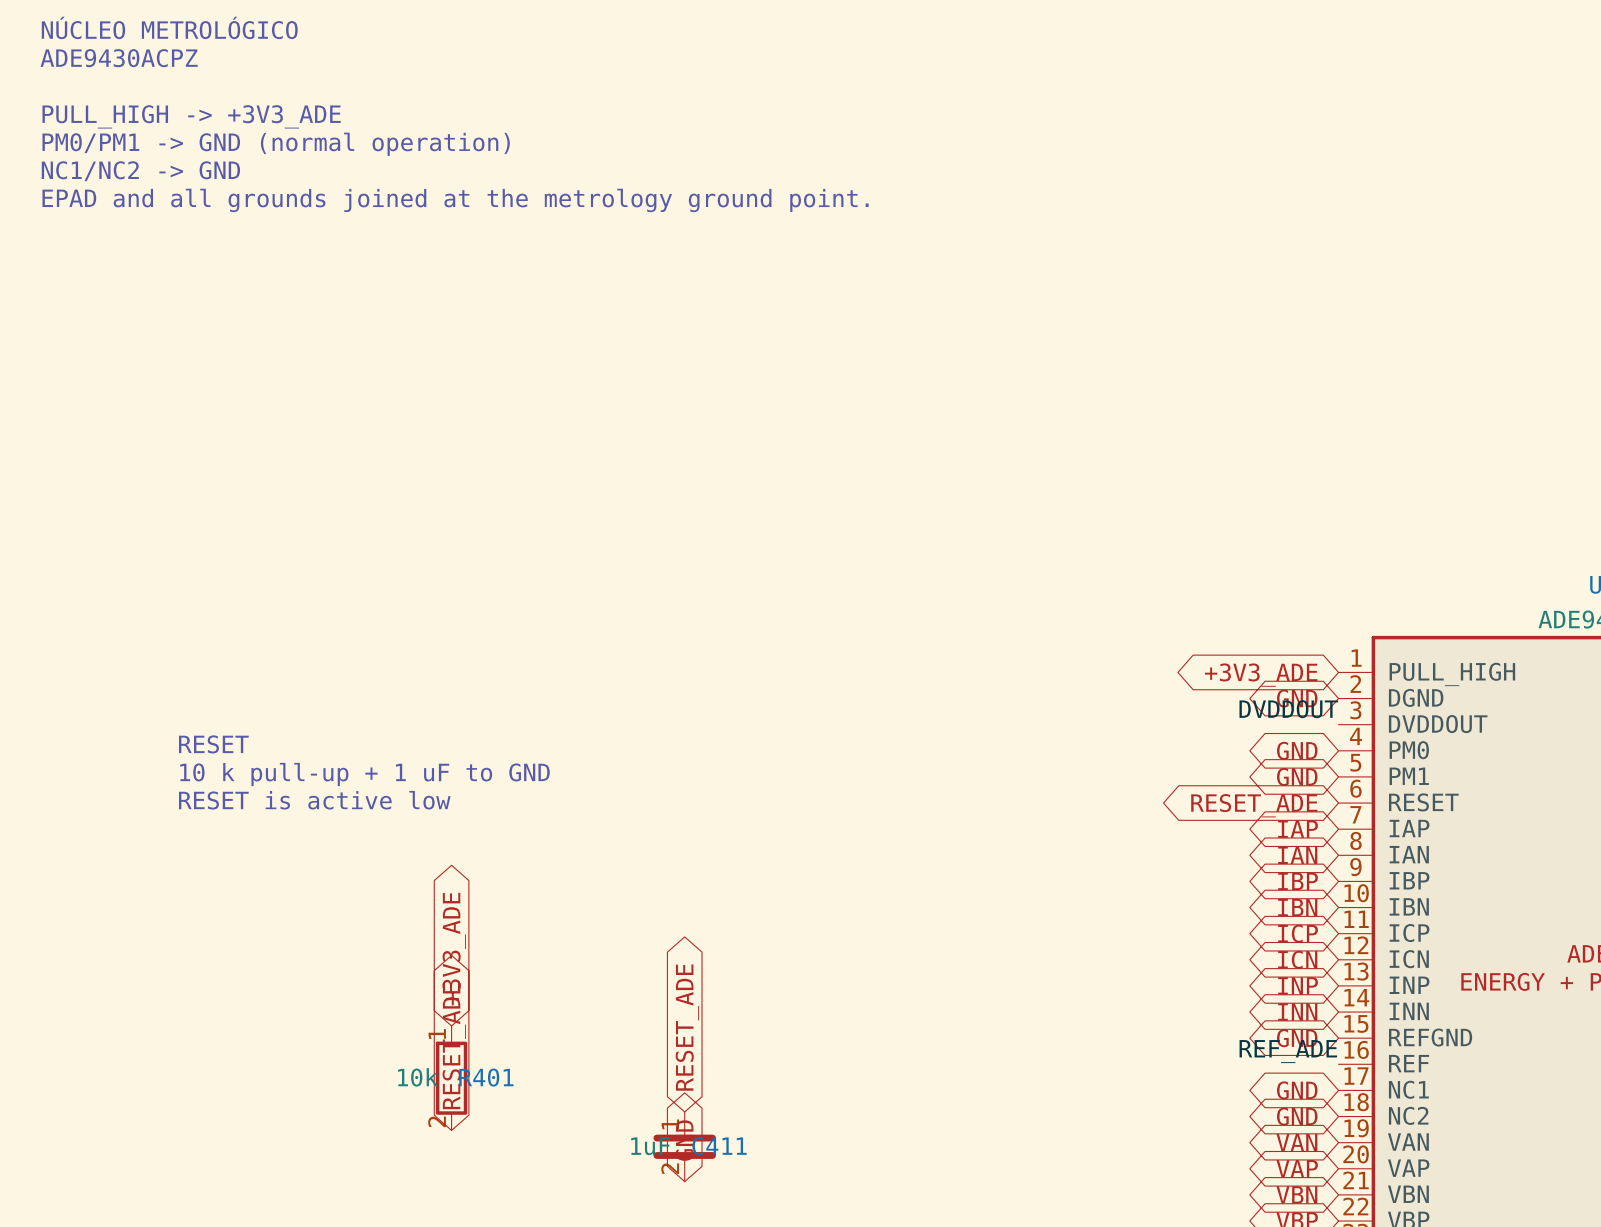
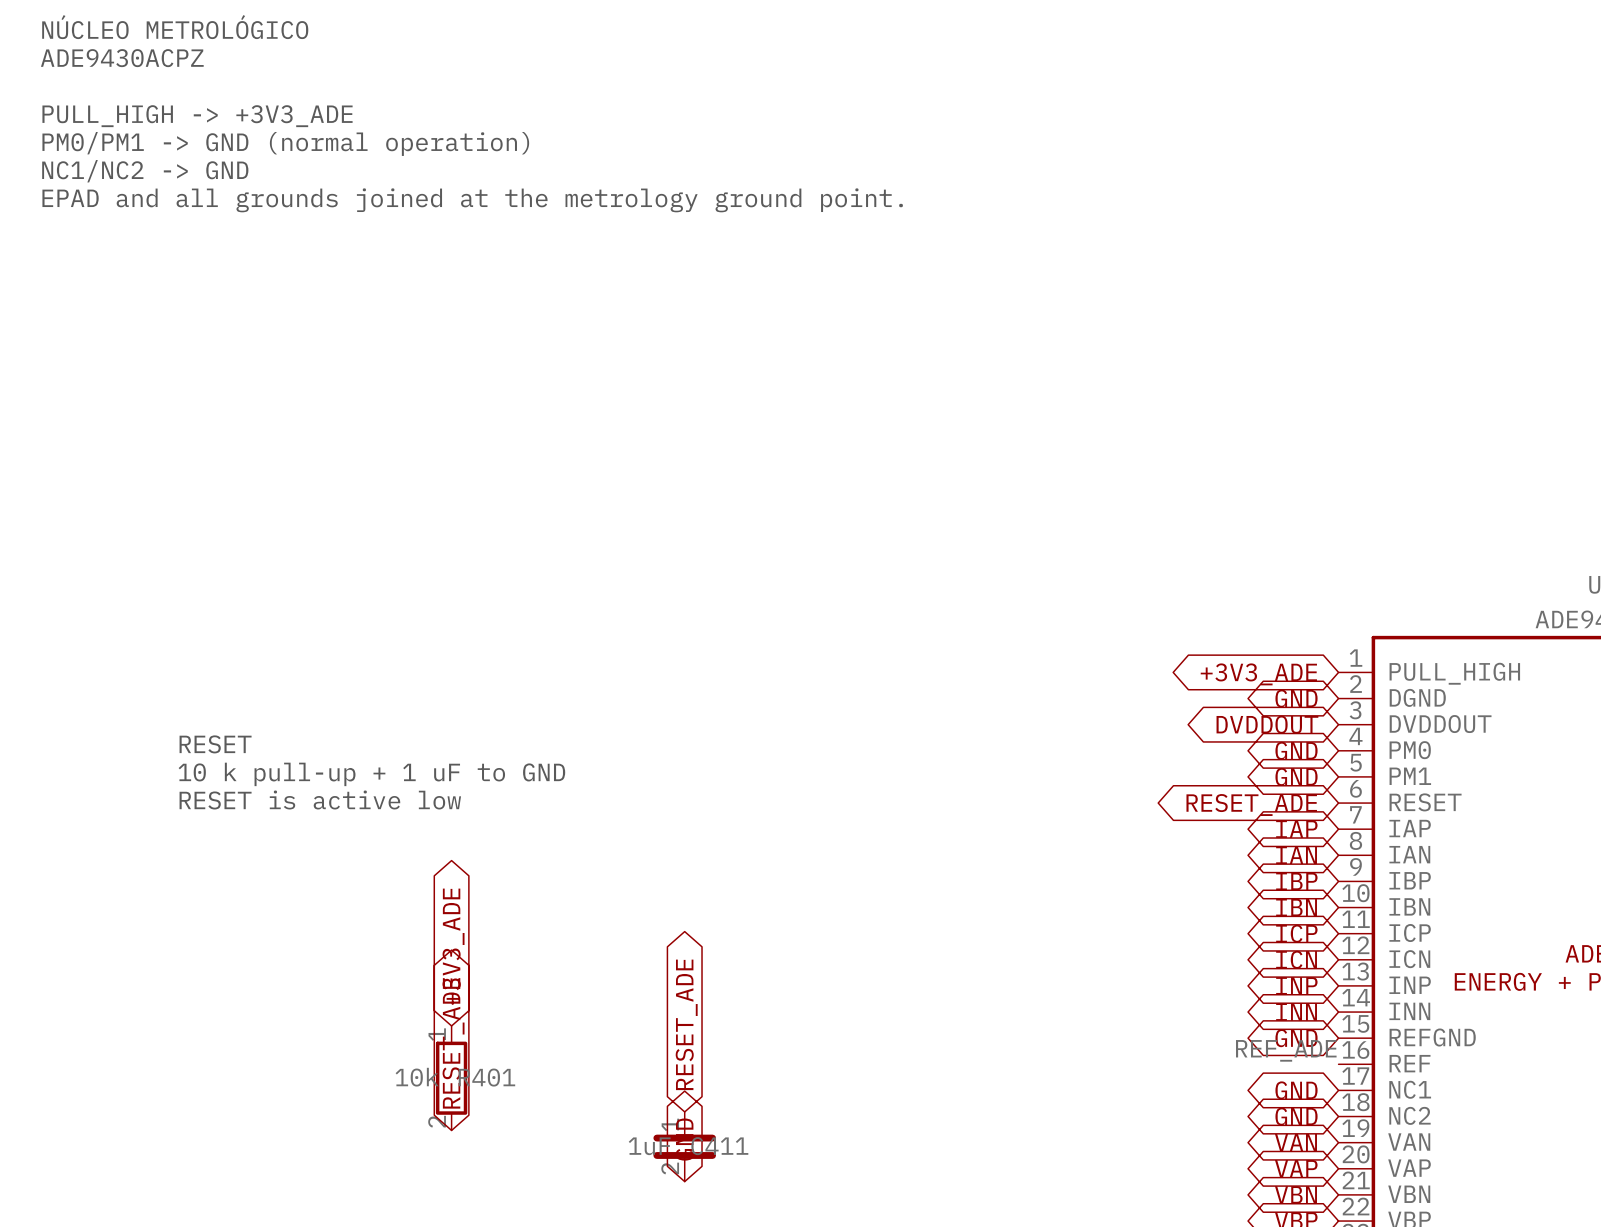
label: DVDDOUT (1288, 709) -> none
global label: none -> DVDDOUT (1267, 724)

